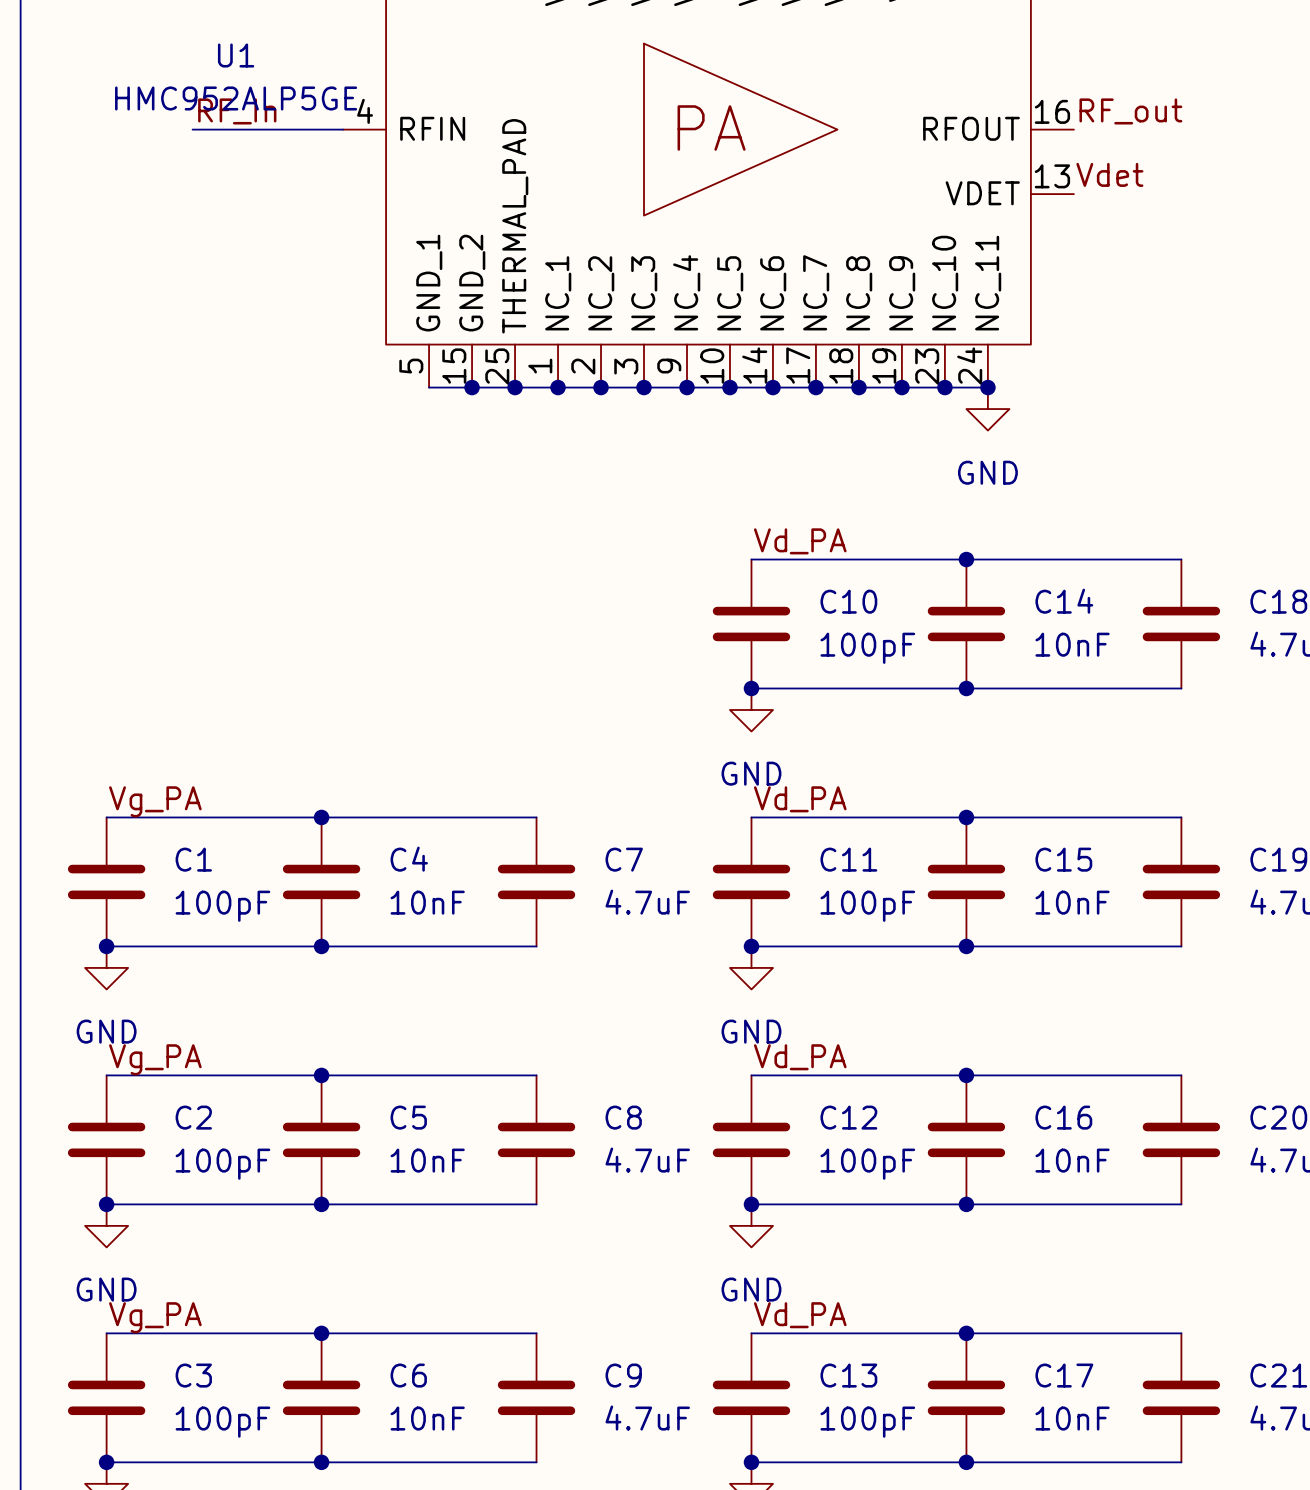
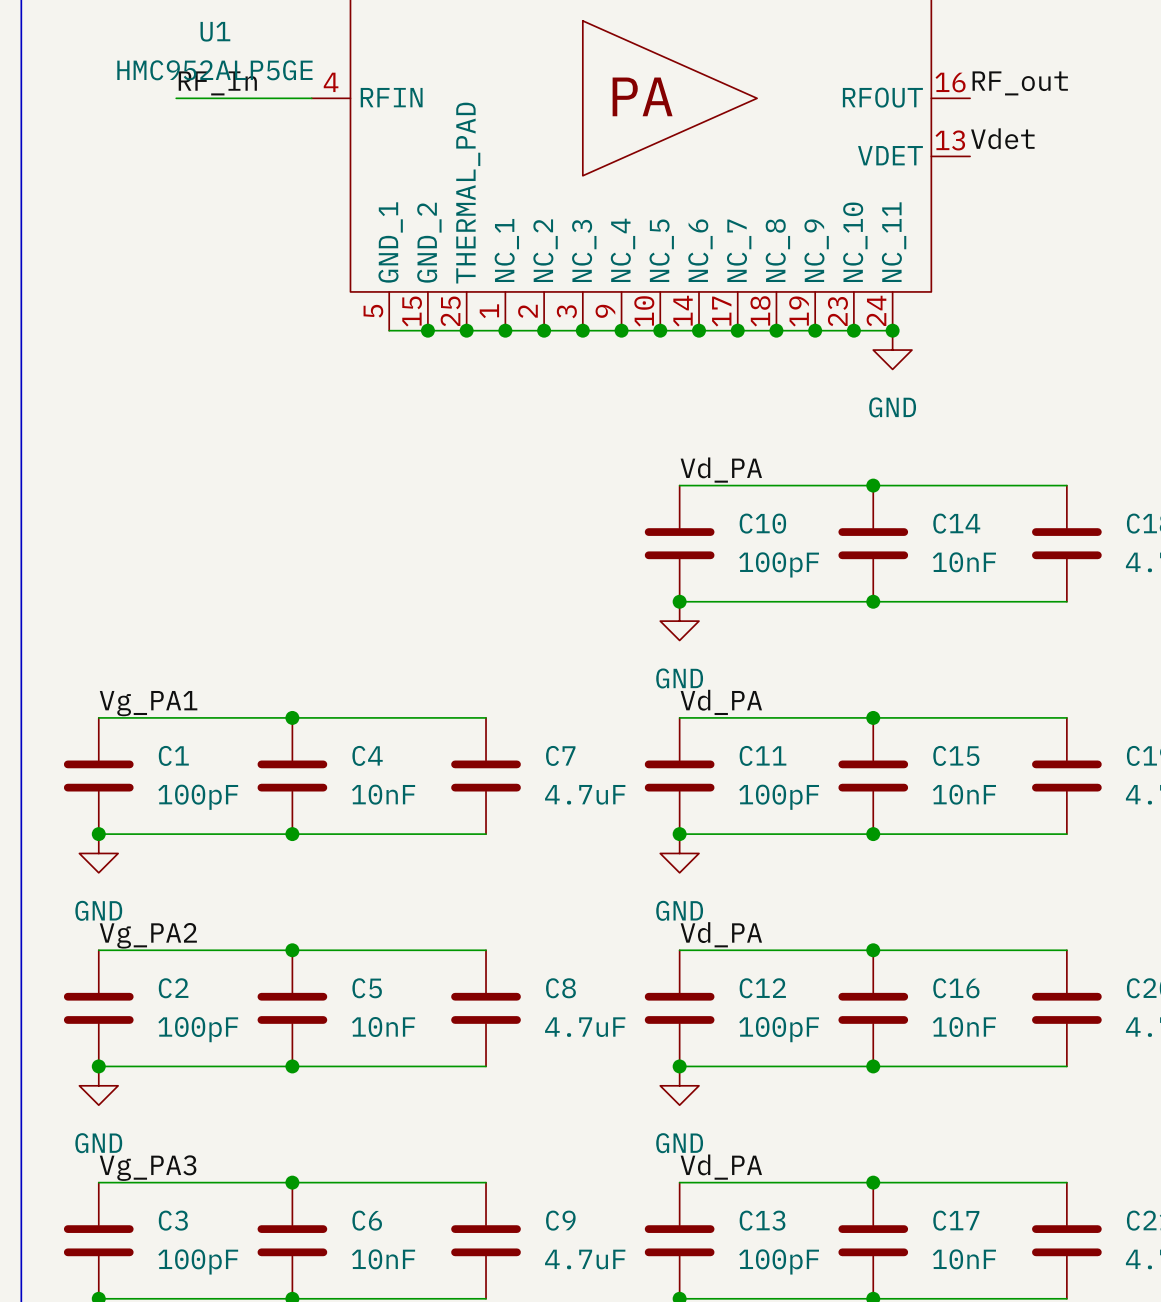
label: Vg_PA (155, 801) -> Vg_PA1 (148, 703)
label: Vg_PA (155, 1059) -> Vg_PA2 (148, 935)
label: Vg_PA (155, 1317) -> Vg_PA3 (148, 1168)

